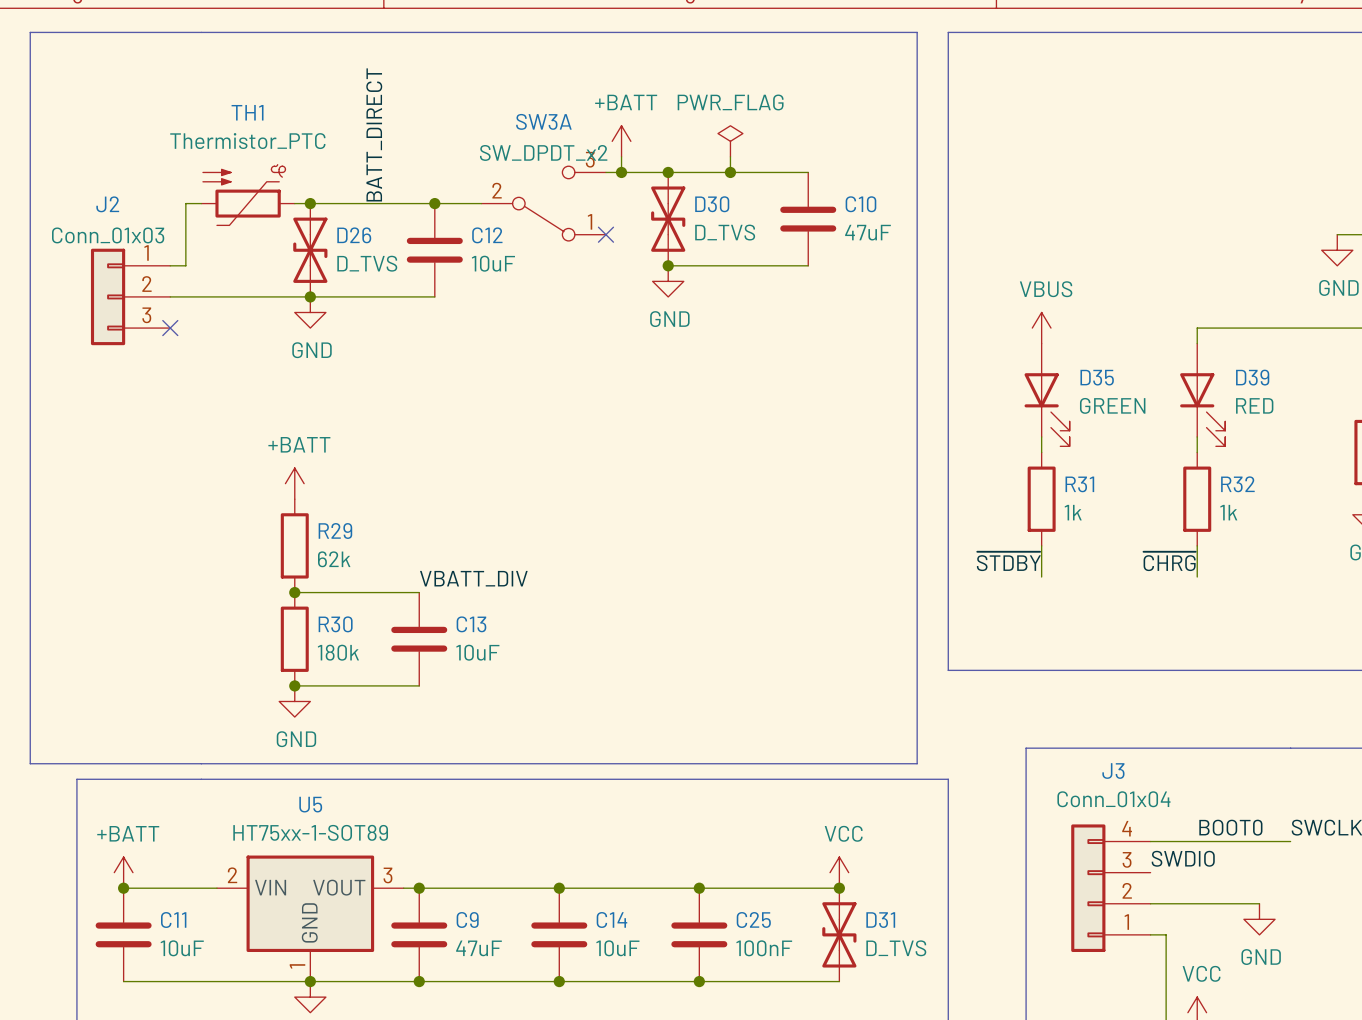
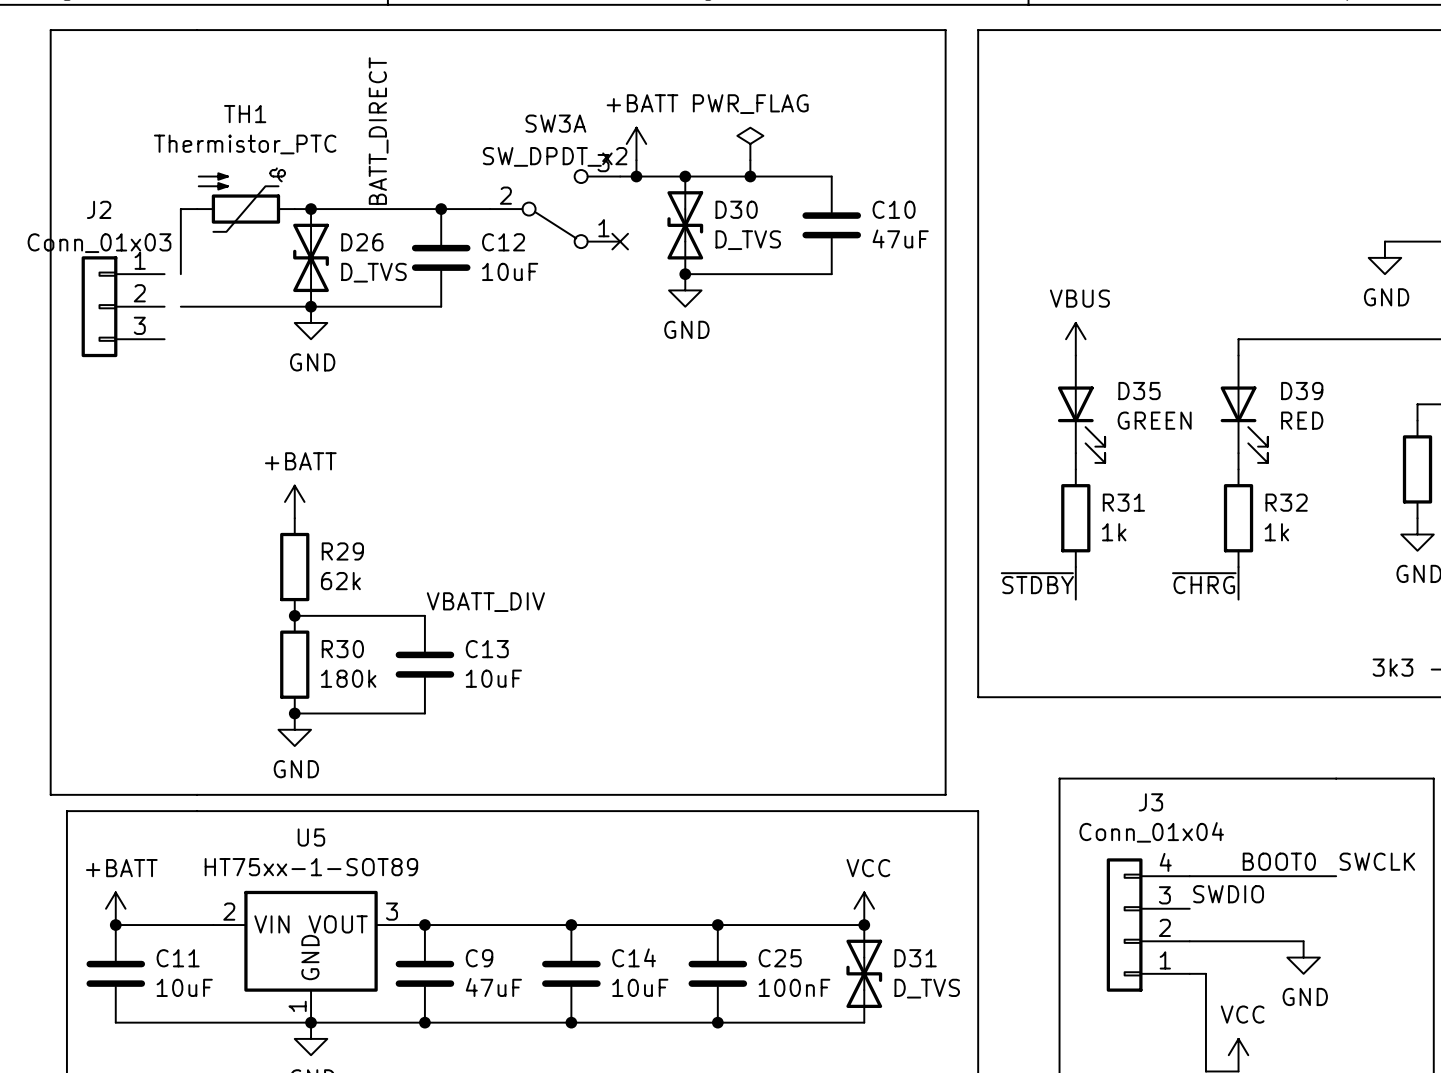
line: (61, 32) (30, 32) (30, 763) (61, 763) -> (50, 30) (50, 794)
wire: (170, 265) (185, 265) -> none
wire: (170, 296) (185, 296) -> none
no-connect mark: (170, 328) -> none

